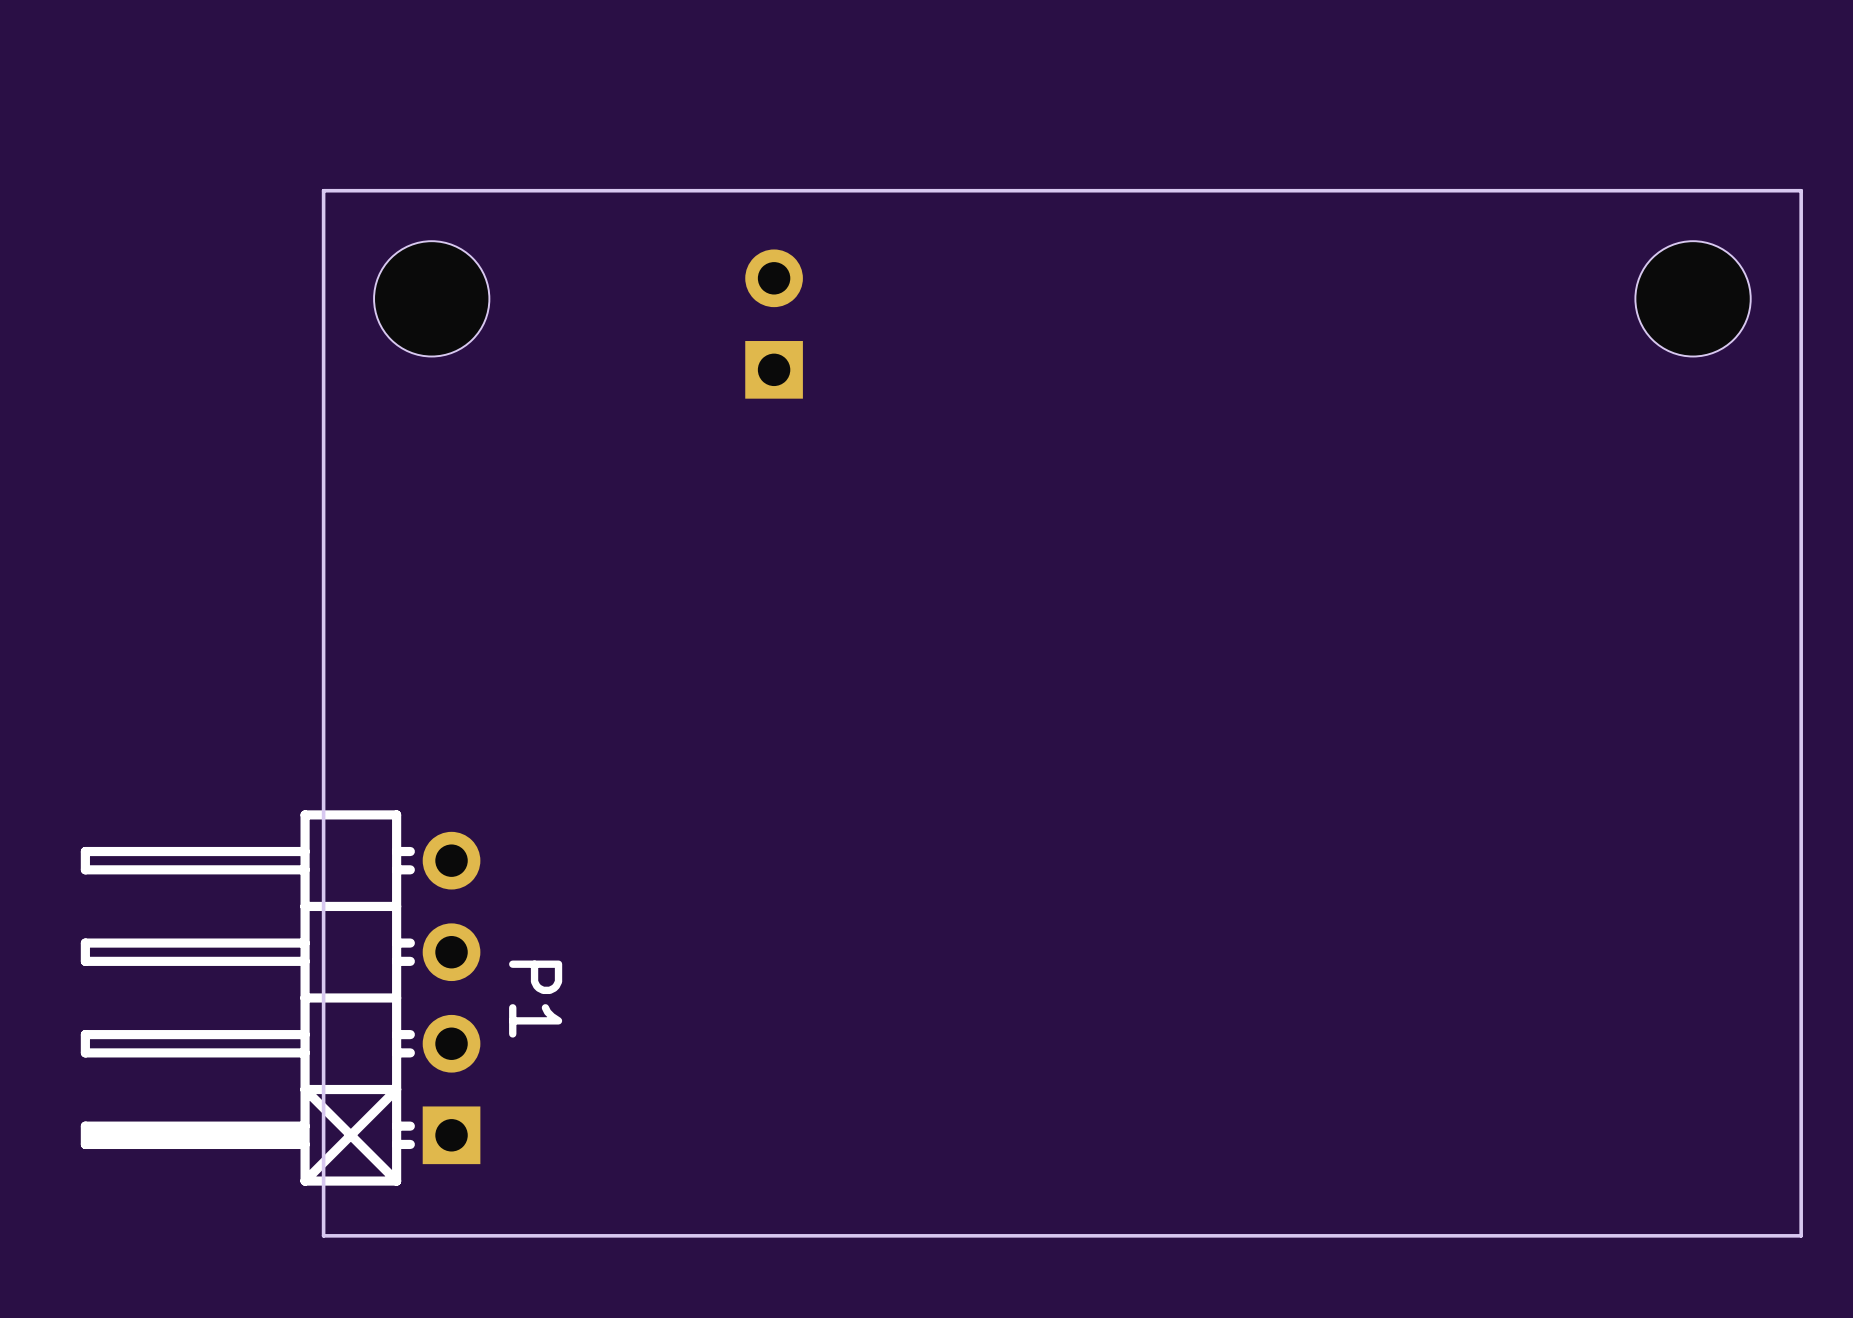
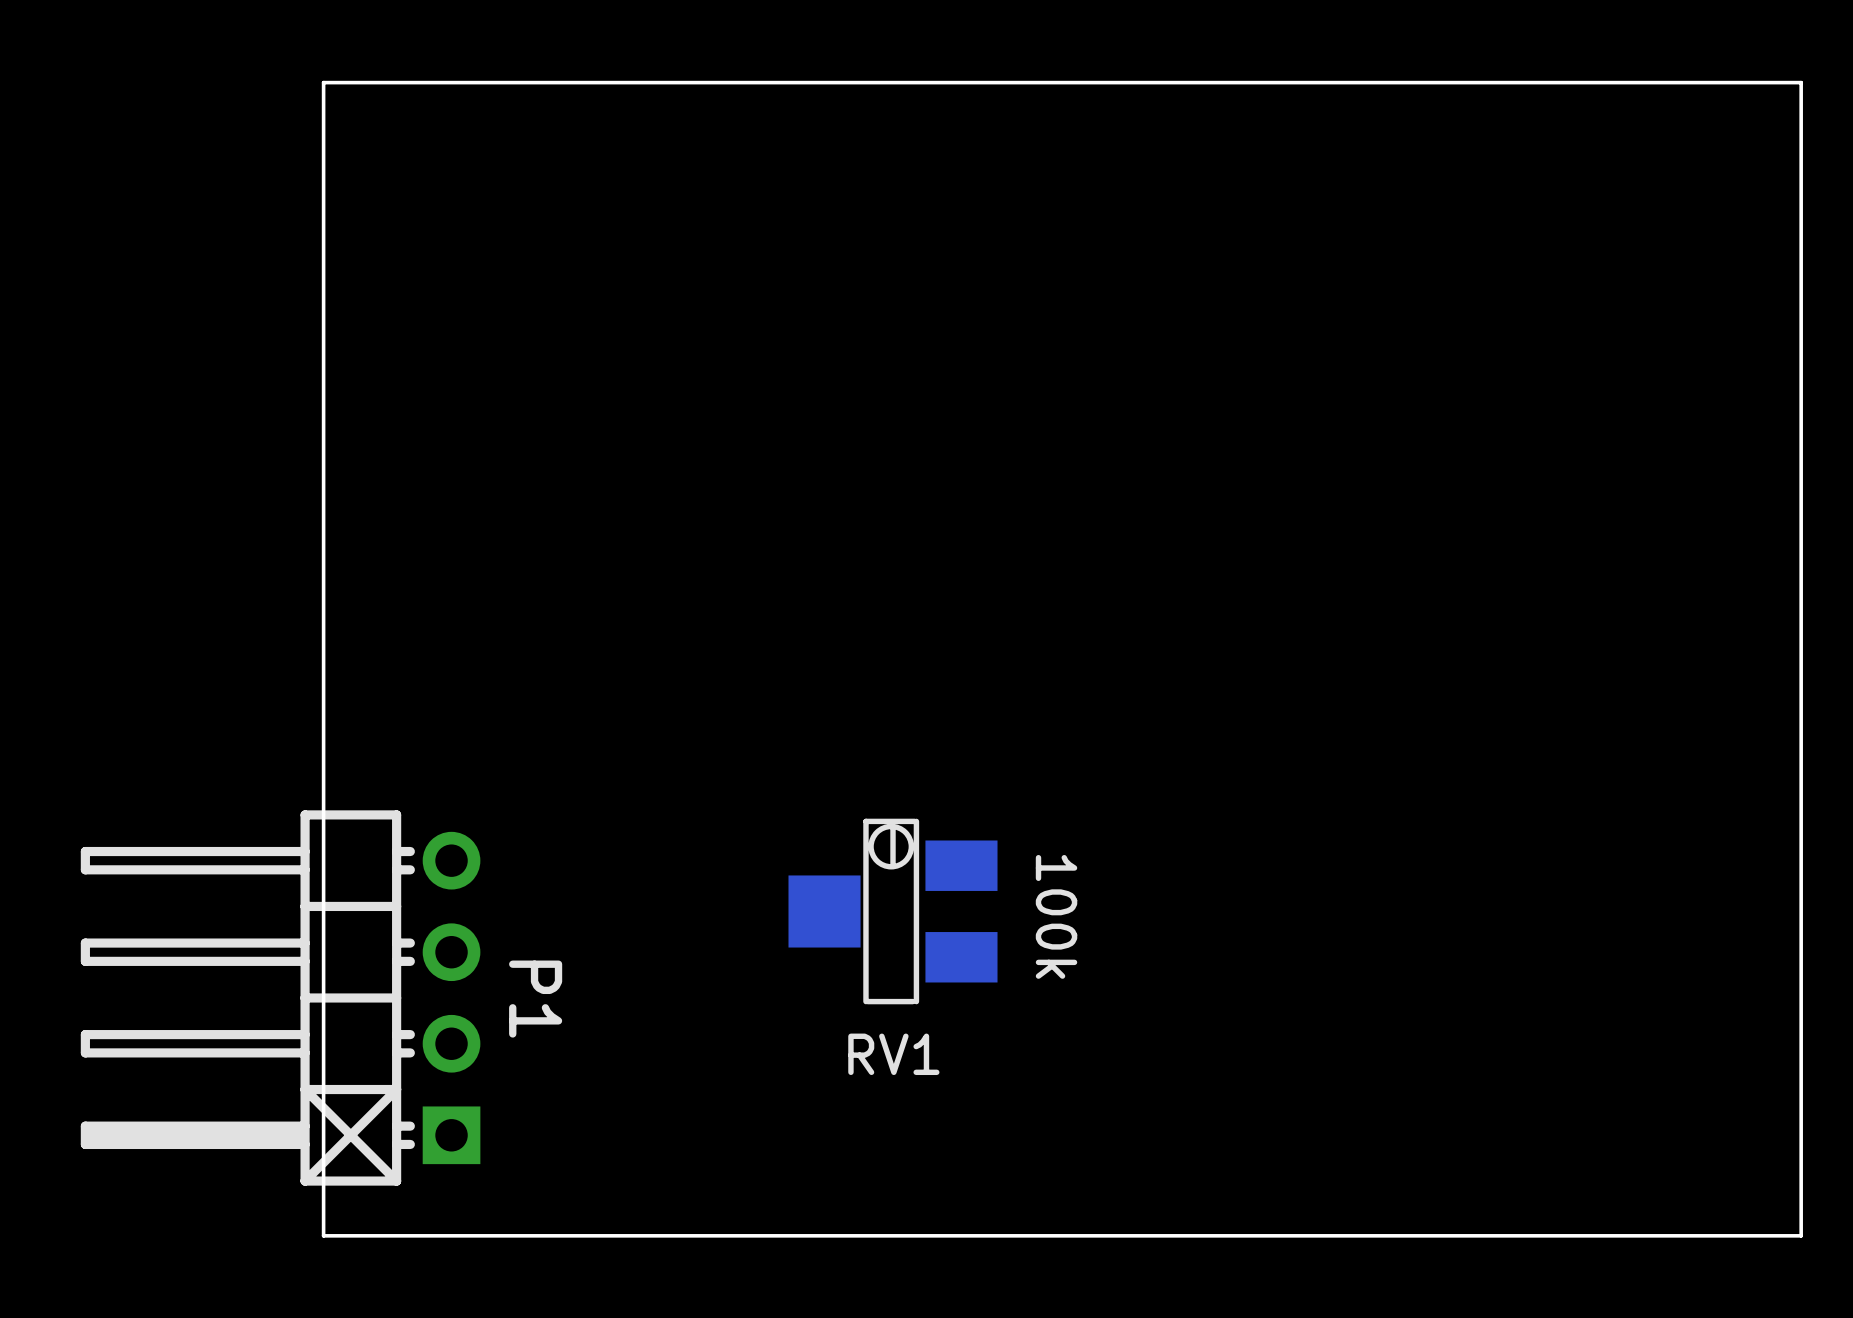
board edge: (1801, 190) (323, 190) -> (1801, 190) (1801, 82) (323, 82) (323, 190)
part: (431, 298) -> none
part: (1693, 298) -> none
part: (774, 324) -> none
RV1: none -> 100k (893, 911)

